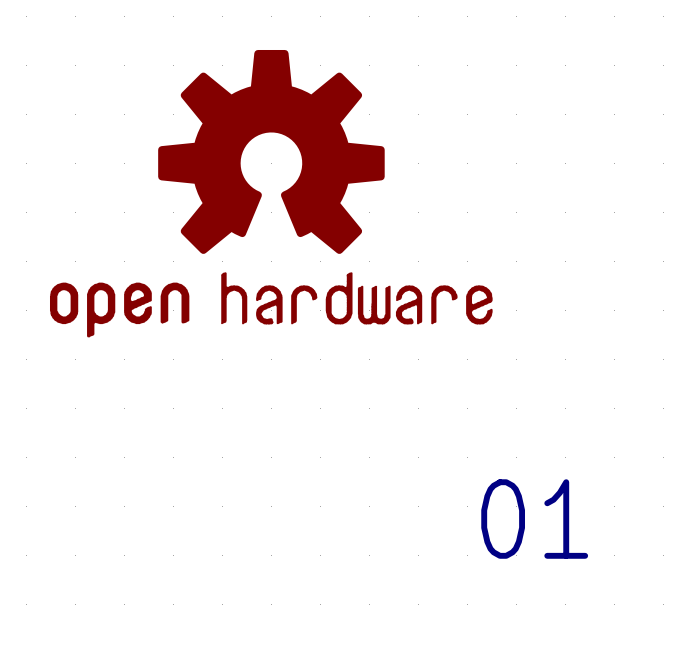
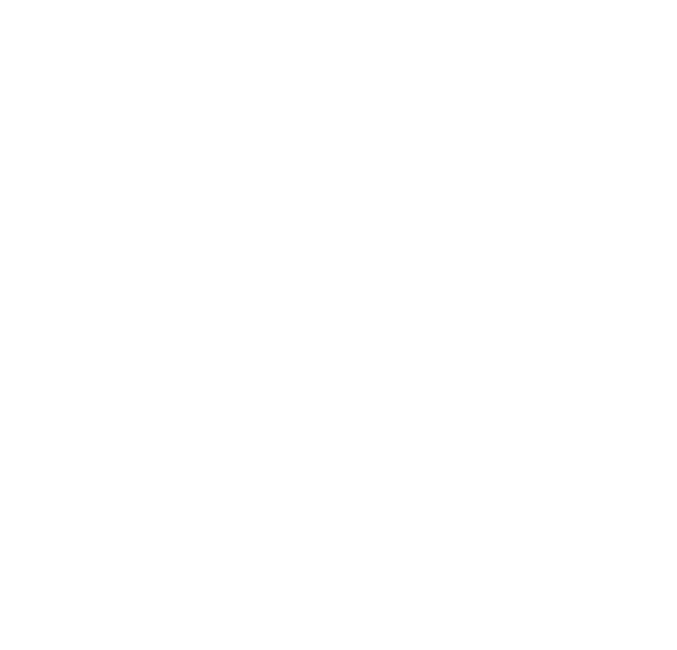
part: (271, 193) -> none
text: 01 (534, 519) -> none

